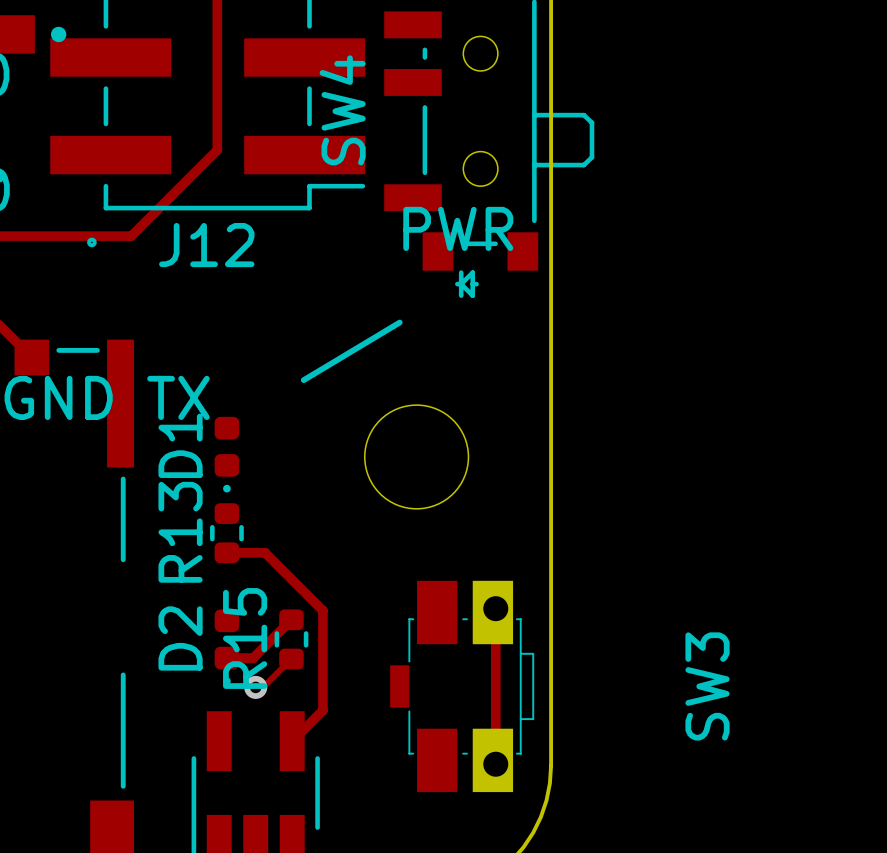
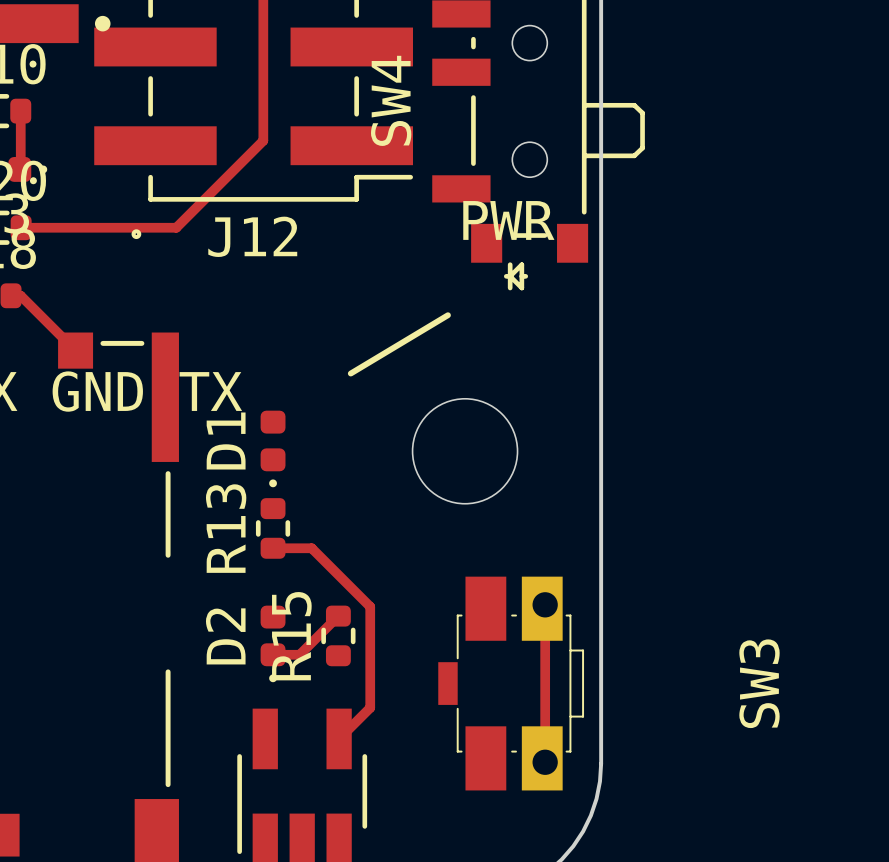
track: (291, 658) (263, 687) (255, 687) -> none
via: (255, 687) -> none

